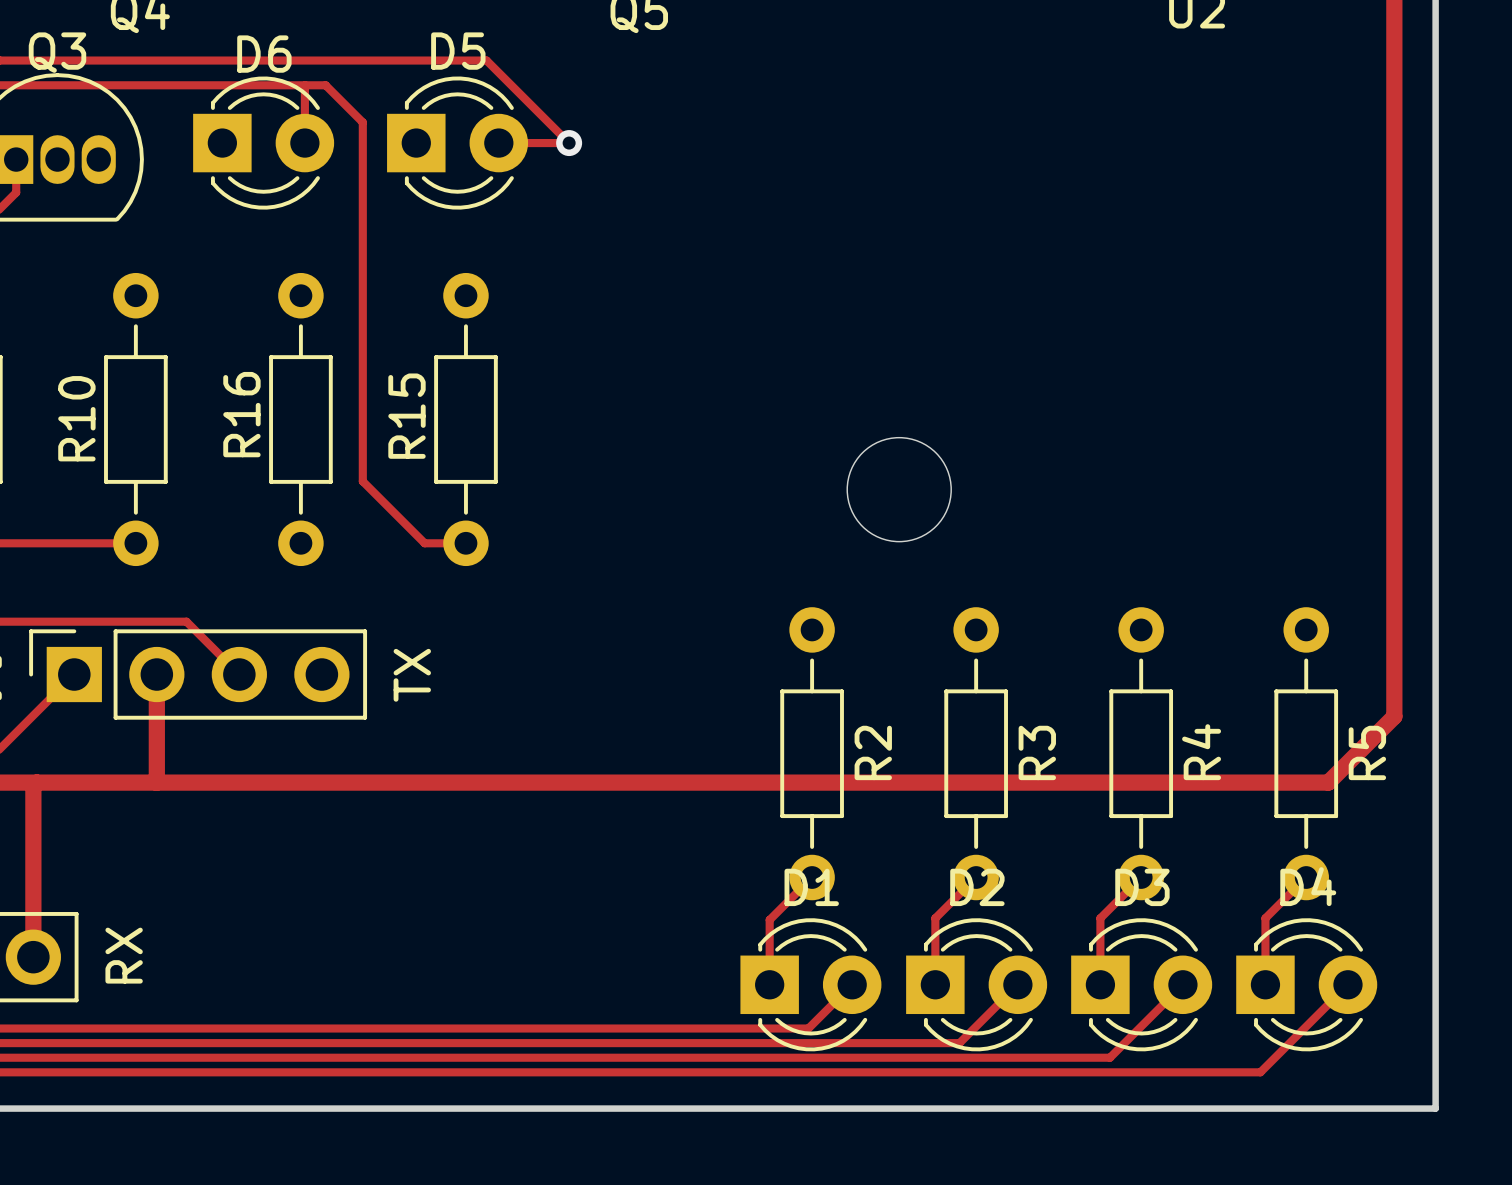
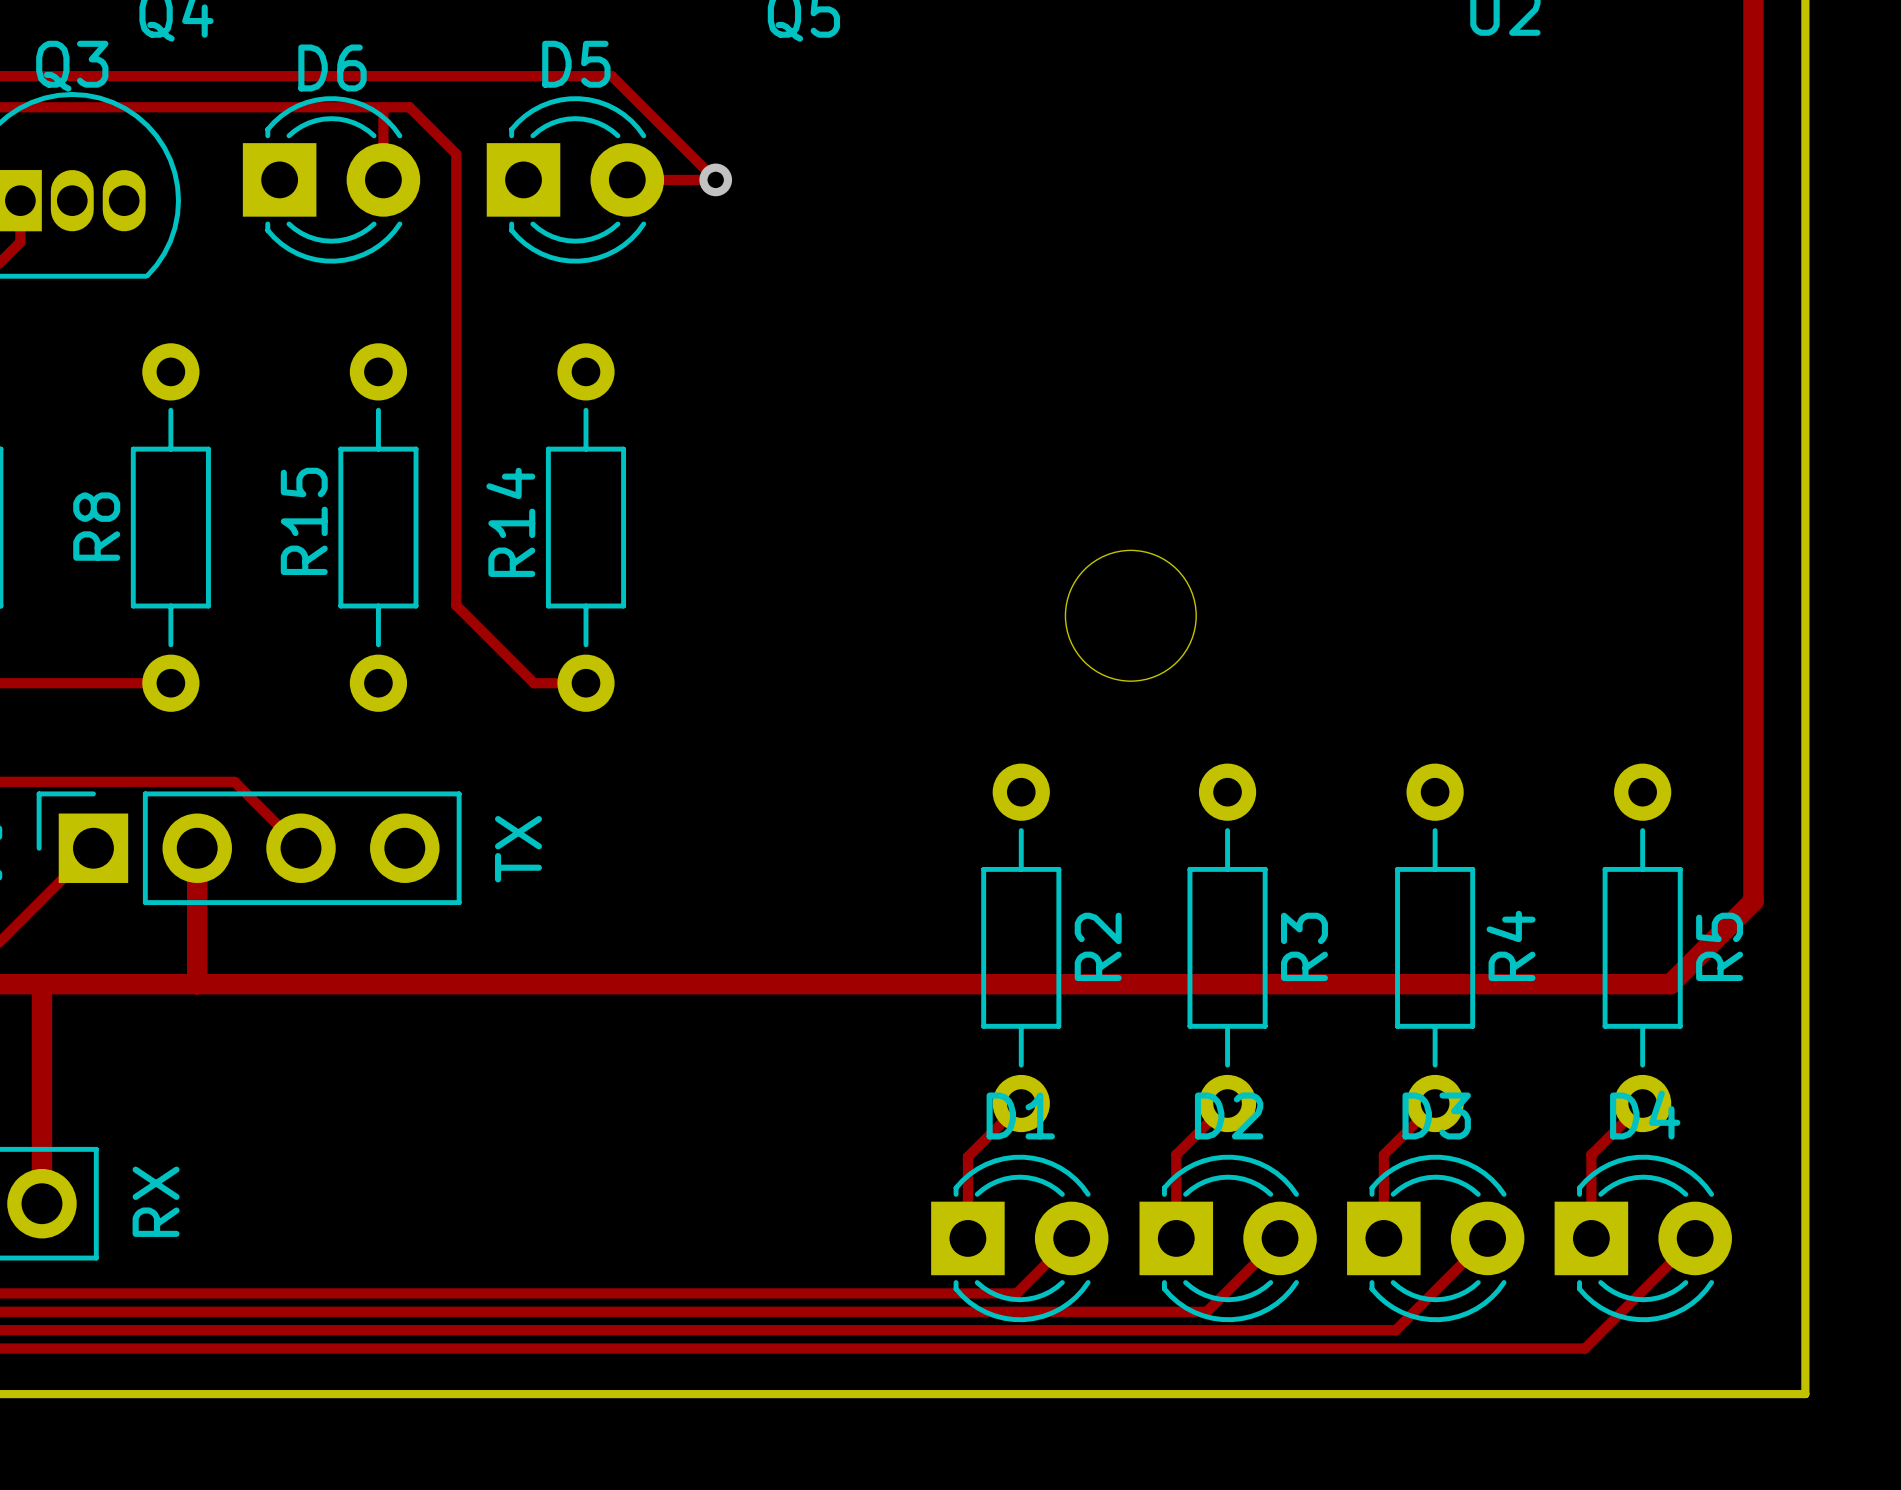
R16 name: R16 (241, 414) -> R15 (304, 521)
R15 name: R15 (406, 416) -> R14 (510, 522)
R10 name: R10 (76, 418) -> R8 (96, 526)

